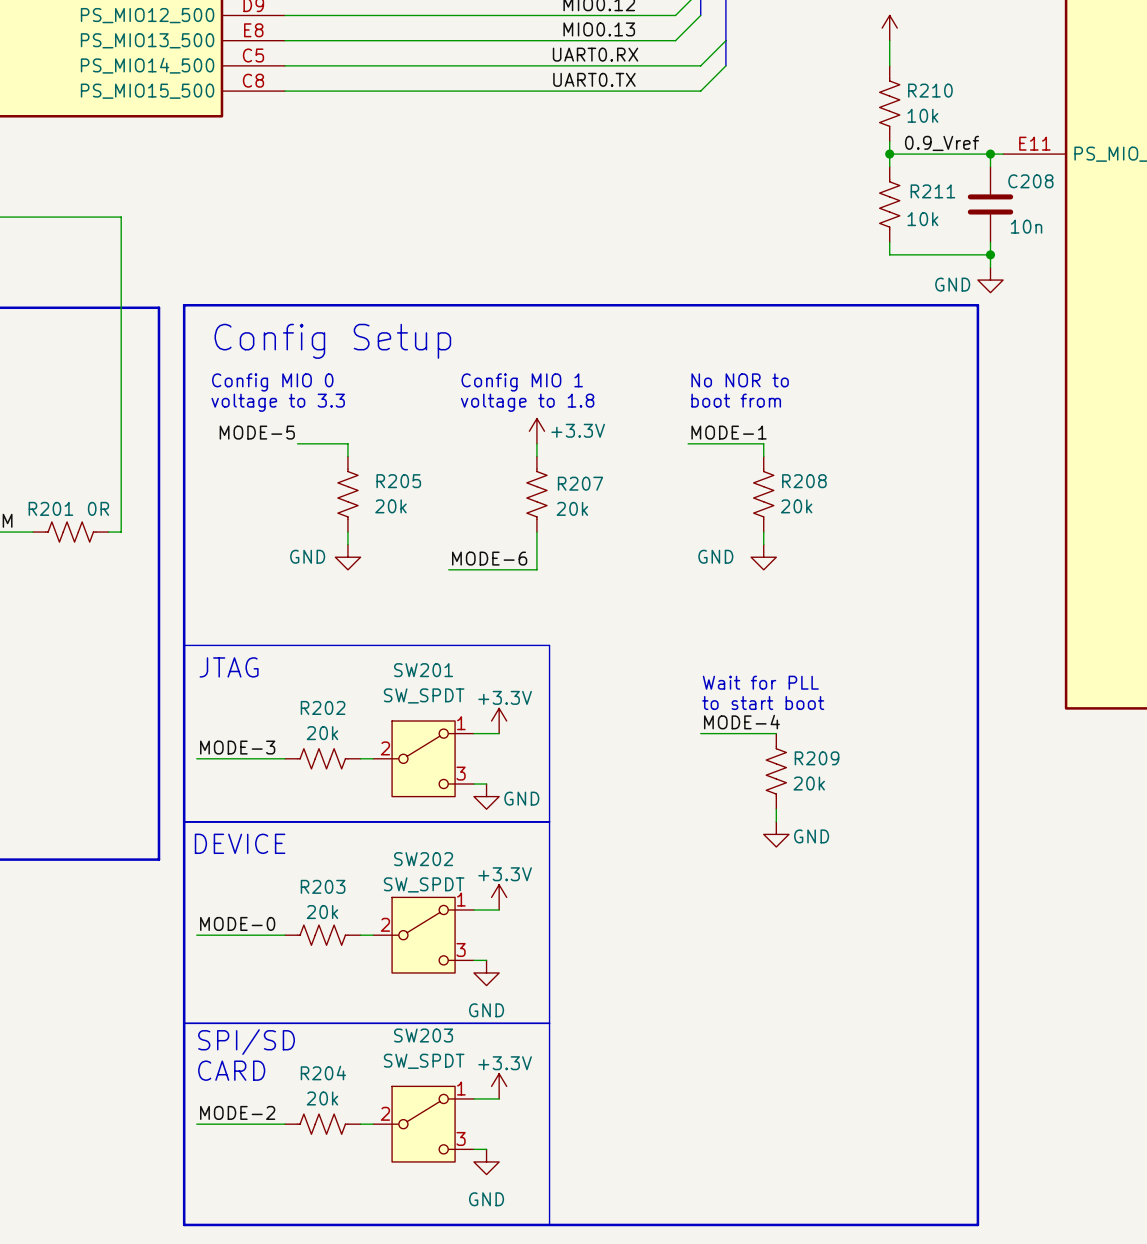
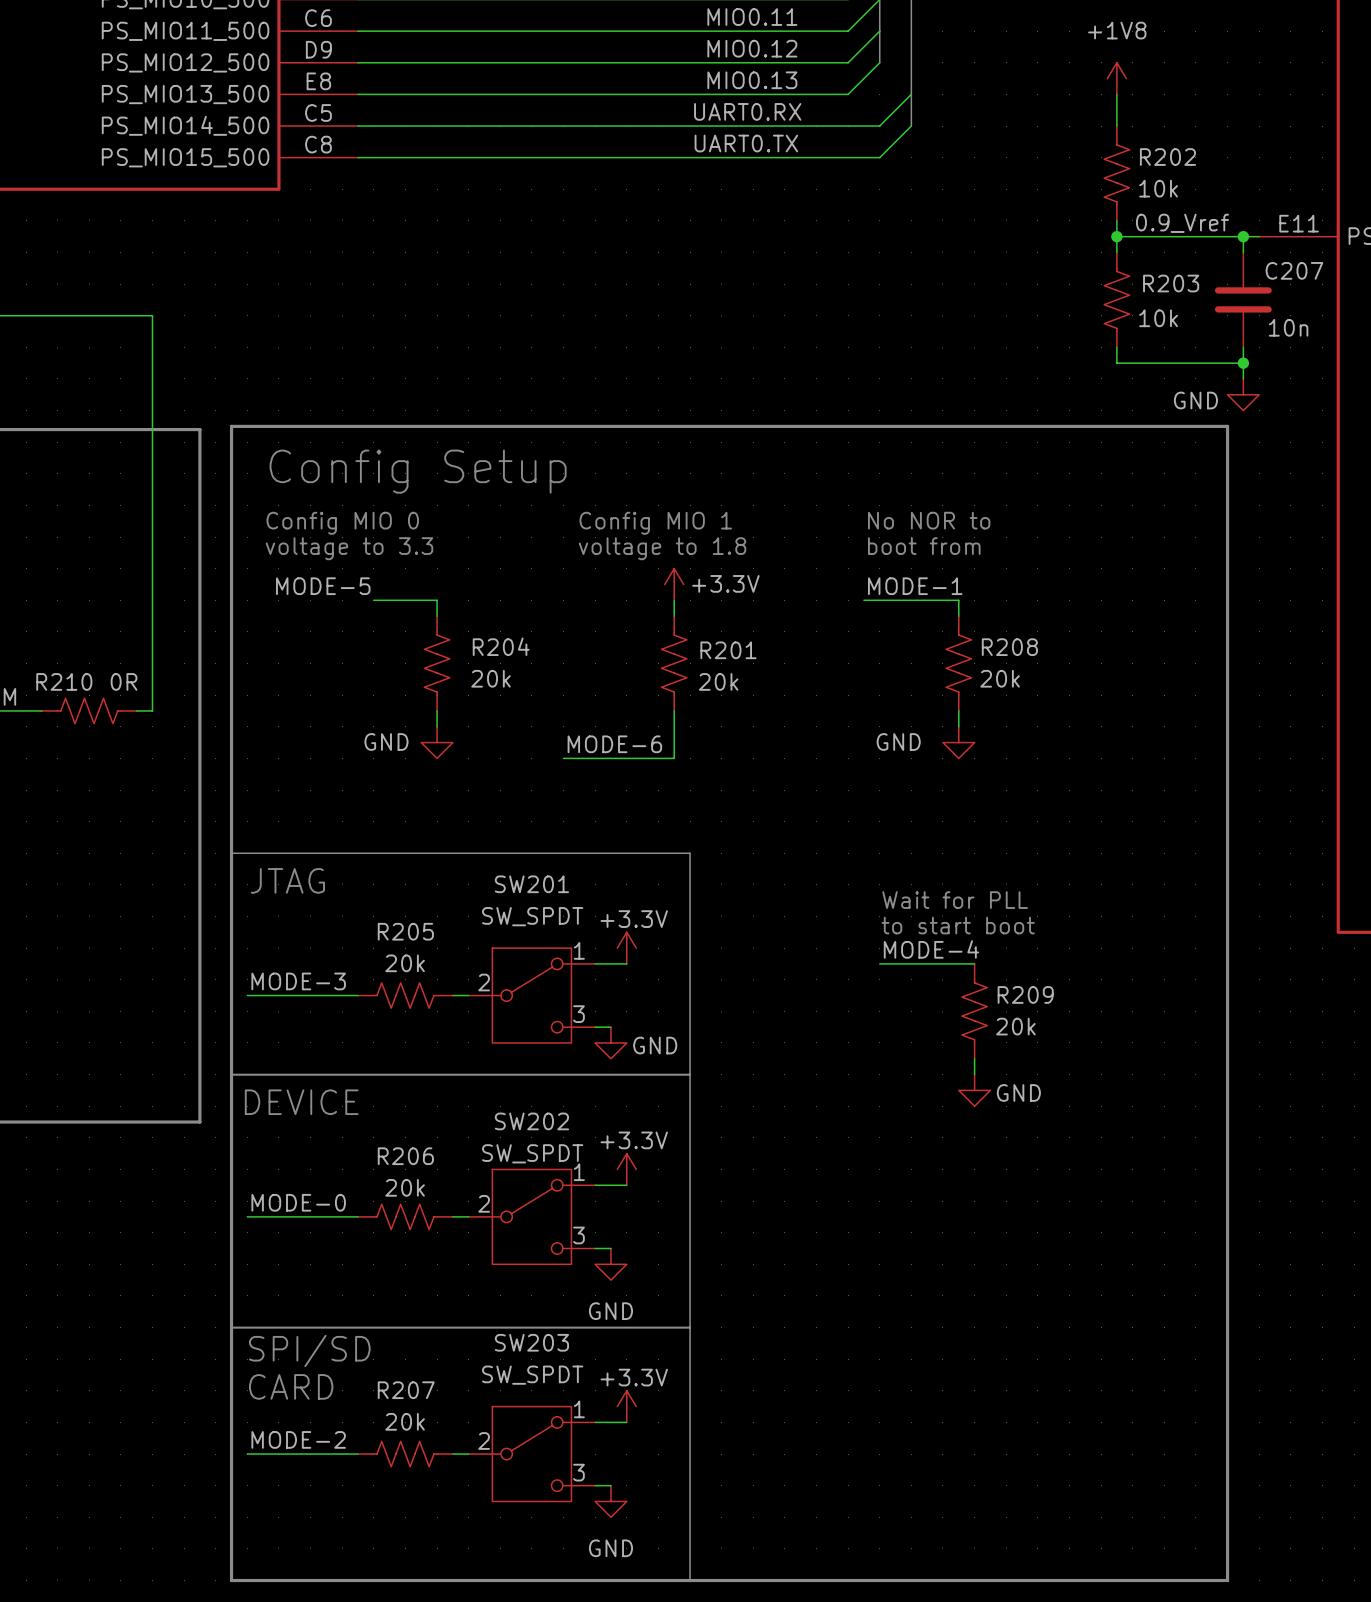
R210 name: R210 (930, 90) -> R202 (1167, 157)
C208 name: C208 (1030, 181) -> C207 (1294, 270)
R211 name: R211 (932, 191) -> R203 (1171, 283)
R205 name: R205 (398, 481) -> R204 (501, 646)
R207 name: R207 (580, 483) -> R201 (728, 650)
R201 name: R201 (50, 508) -> R210 (64, 681)
R202 name: R202 (323, 707) -> R205 (405, 931)
R203 name: R203 (323, 886) -> R206 (405, 1156)
R204 name: R204 (323, 1073) -> R207 (406, 1390)

